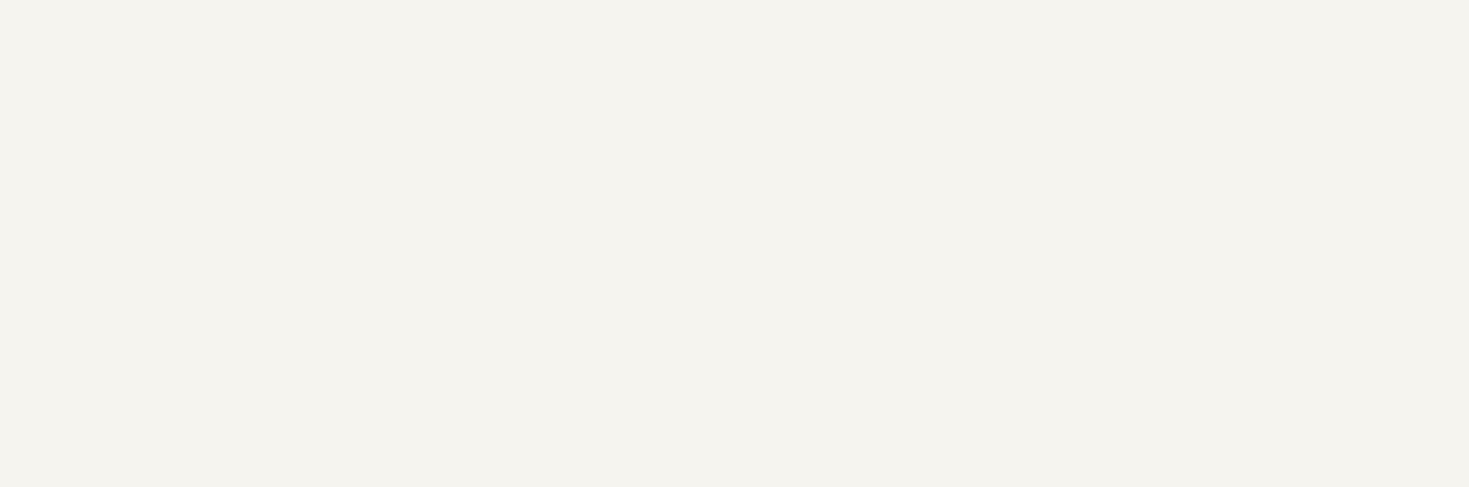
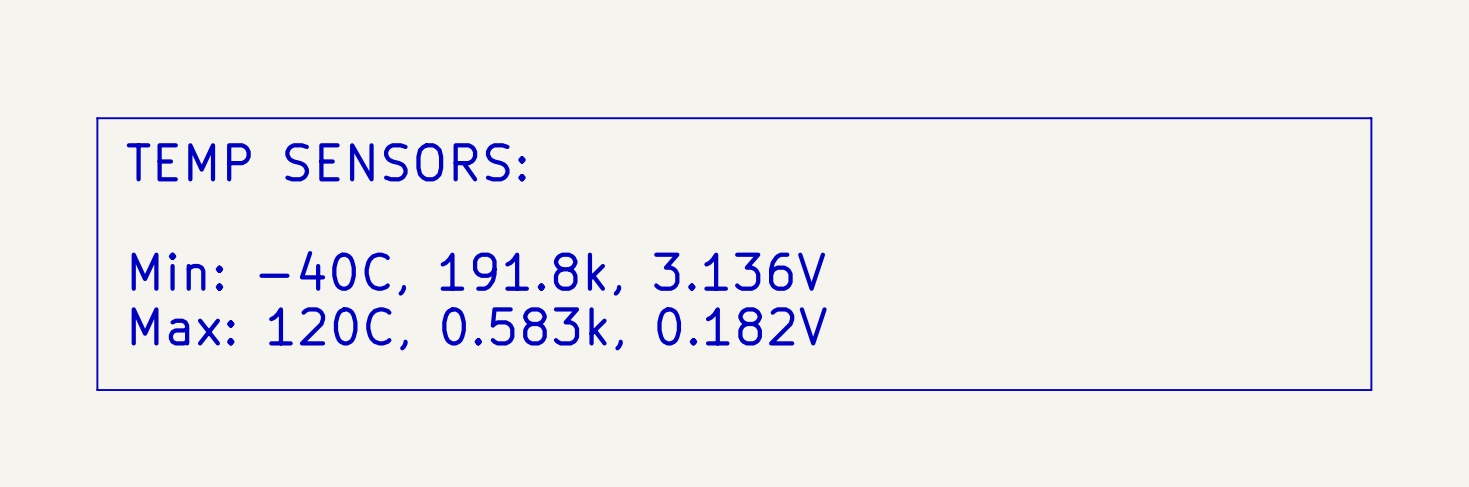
line: none -> (97, 118) (1371, 118) (1371, 390) (97, 390) (97, 118)
text: none -> TEMP SENSORS: (326, 162)
text: none -> Min: -40C, 191.8k, 3.136V (478, 273)
text: none -> Max: 120C, 0.583k, 0.182V (479, 328)

